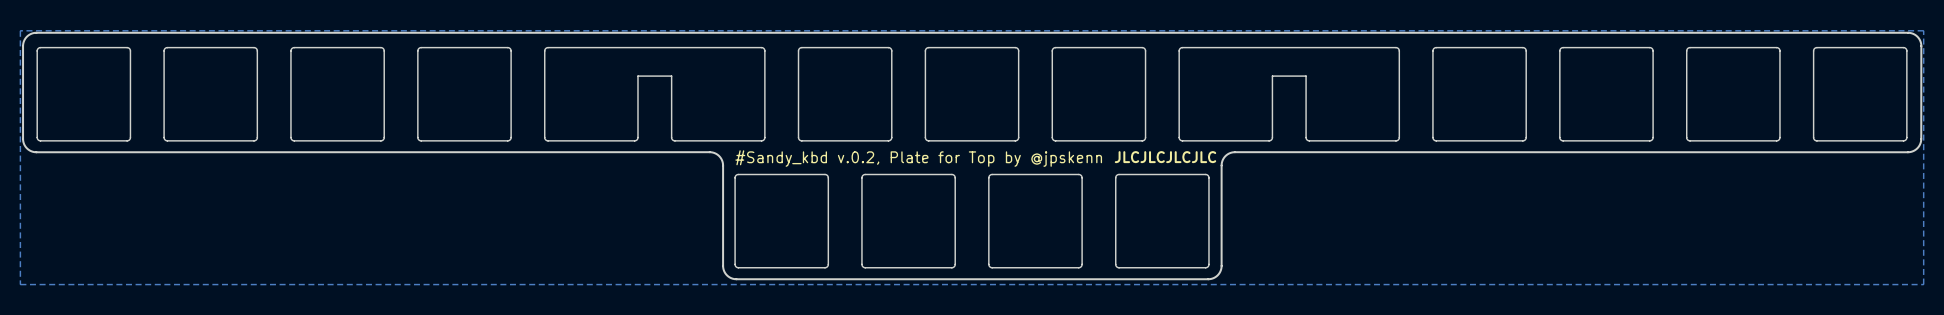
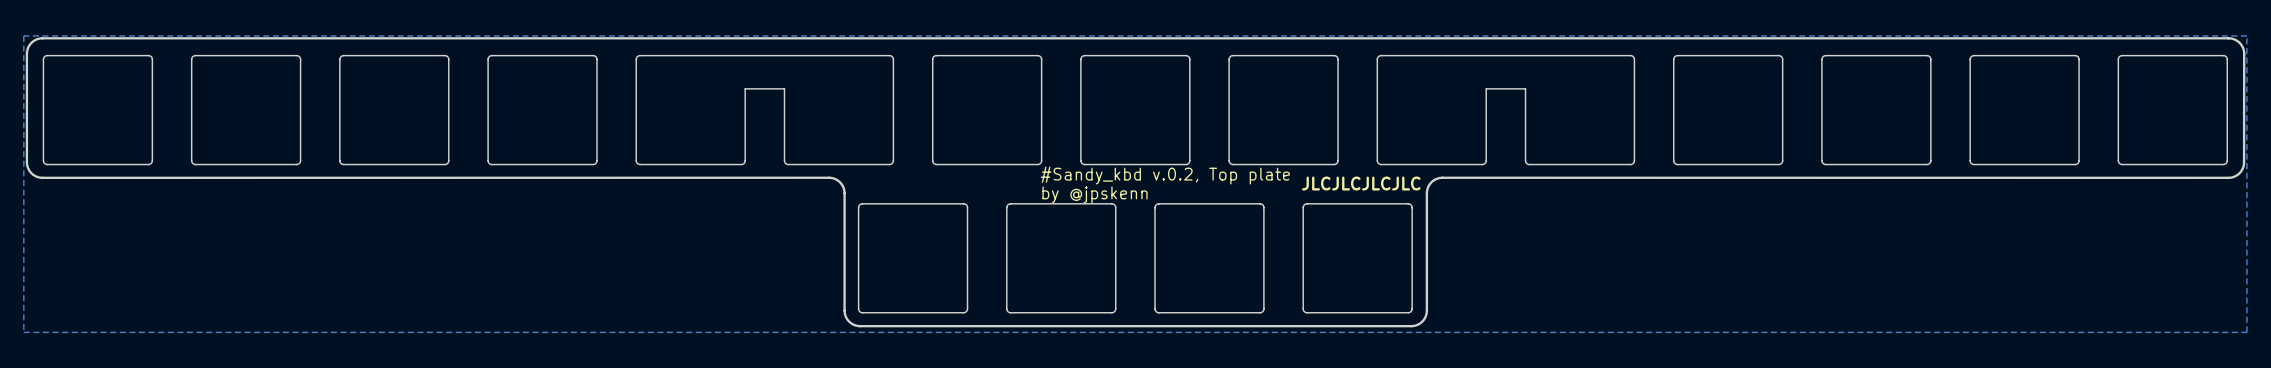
text: #Sandy_kbd v.0.2, Plate for Top by @jpskenn (918, 158) -> #Sandy_kbd v.0.2, Top plate (1165, 175)
text: none -> by @jpskenn (1095, 194)

